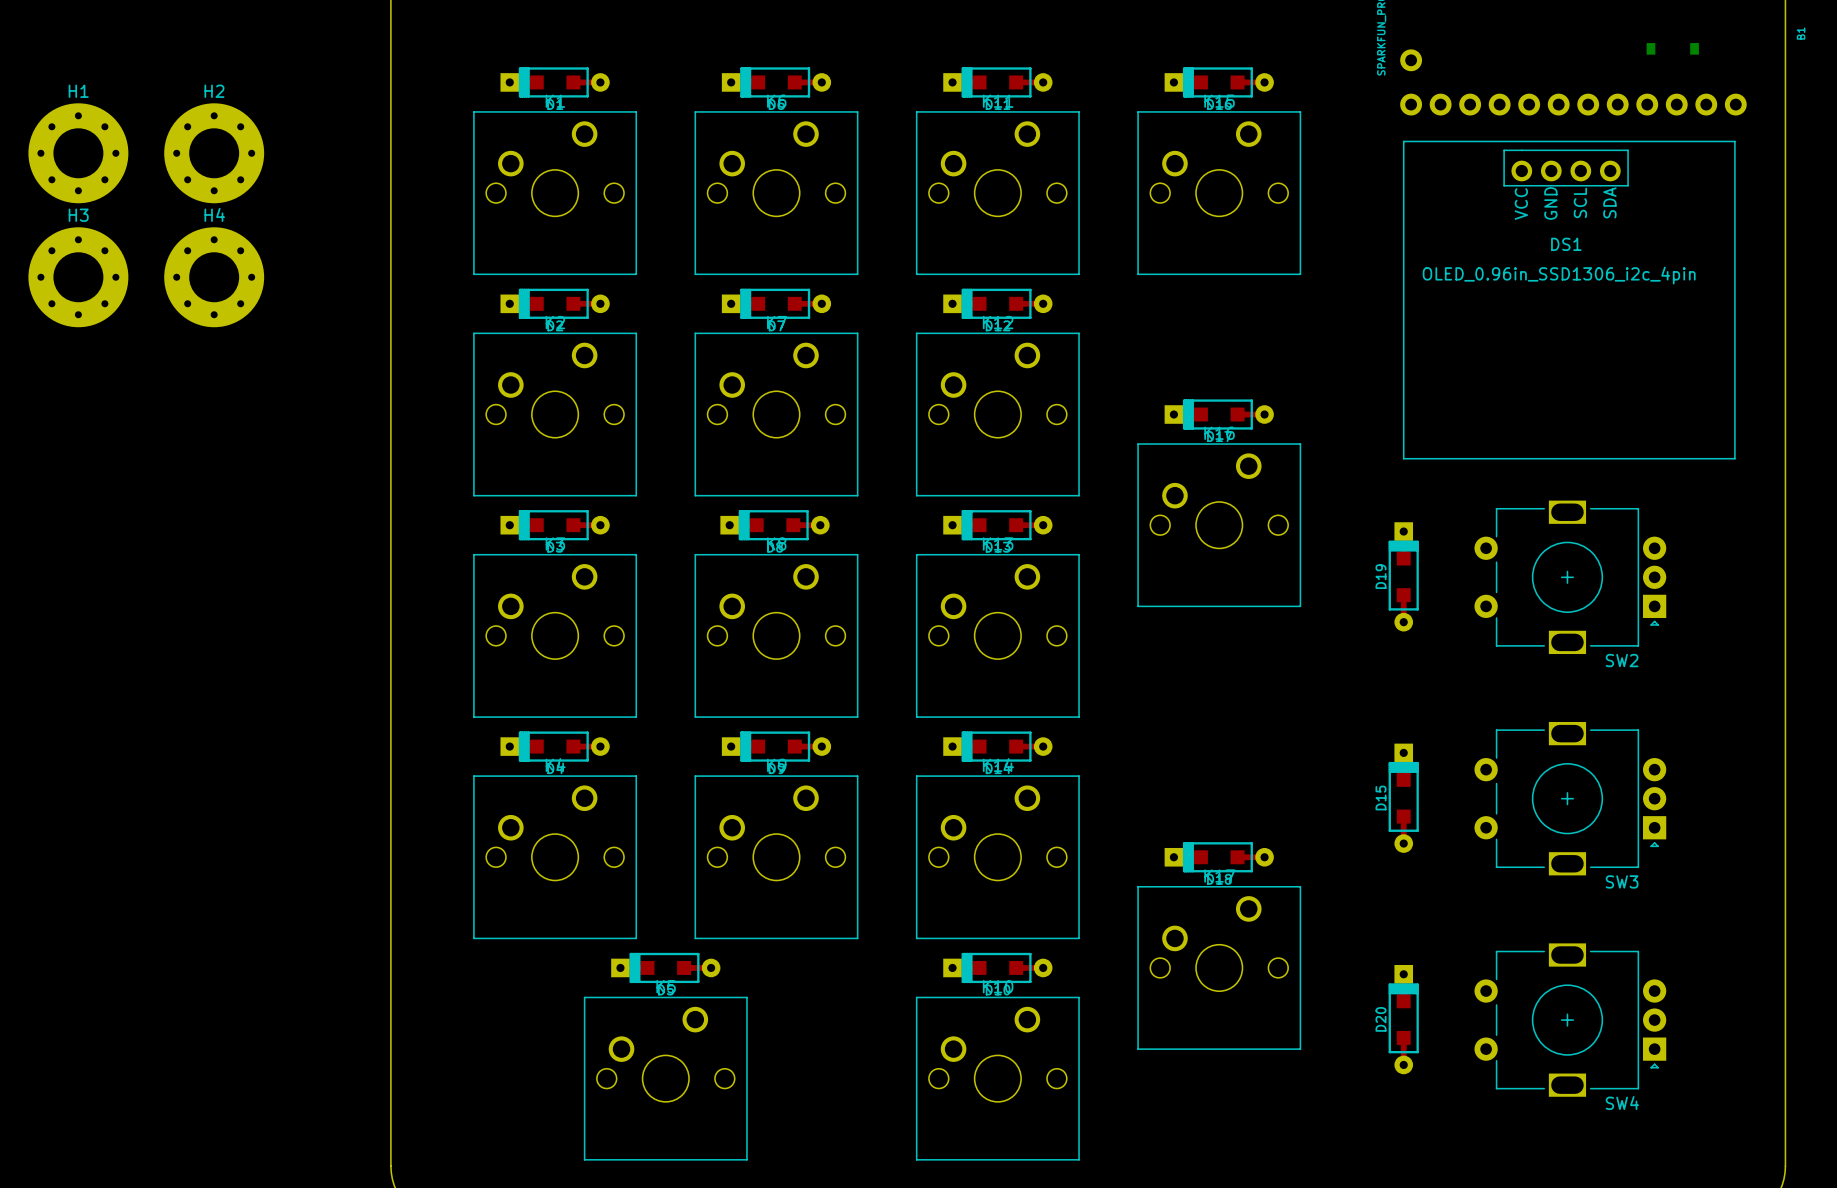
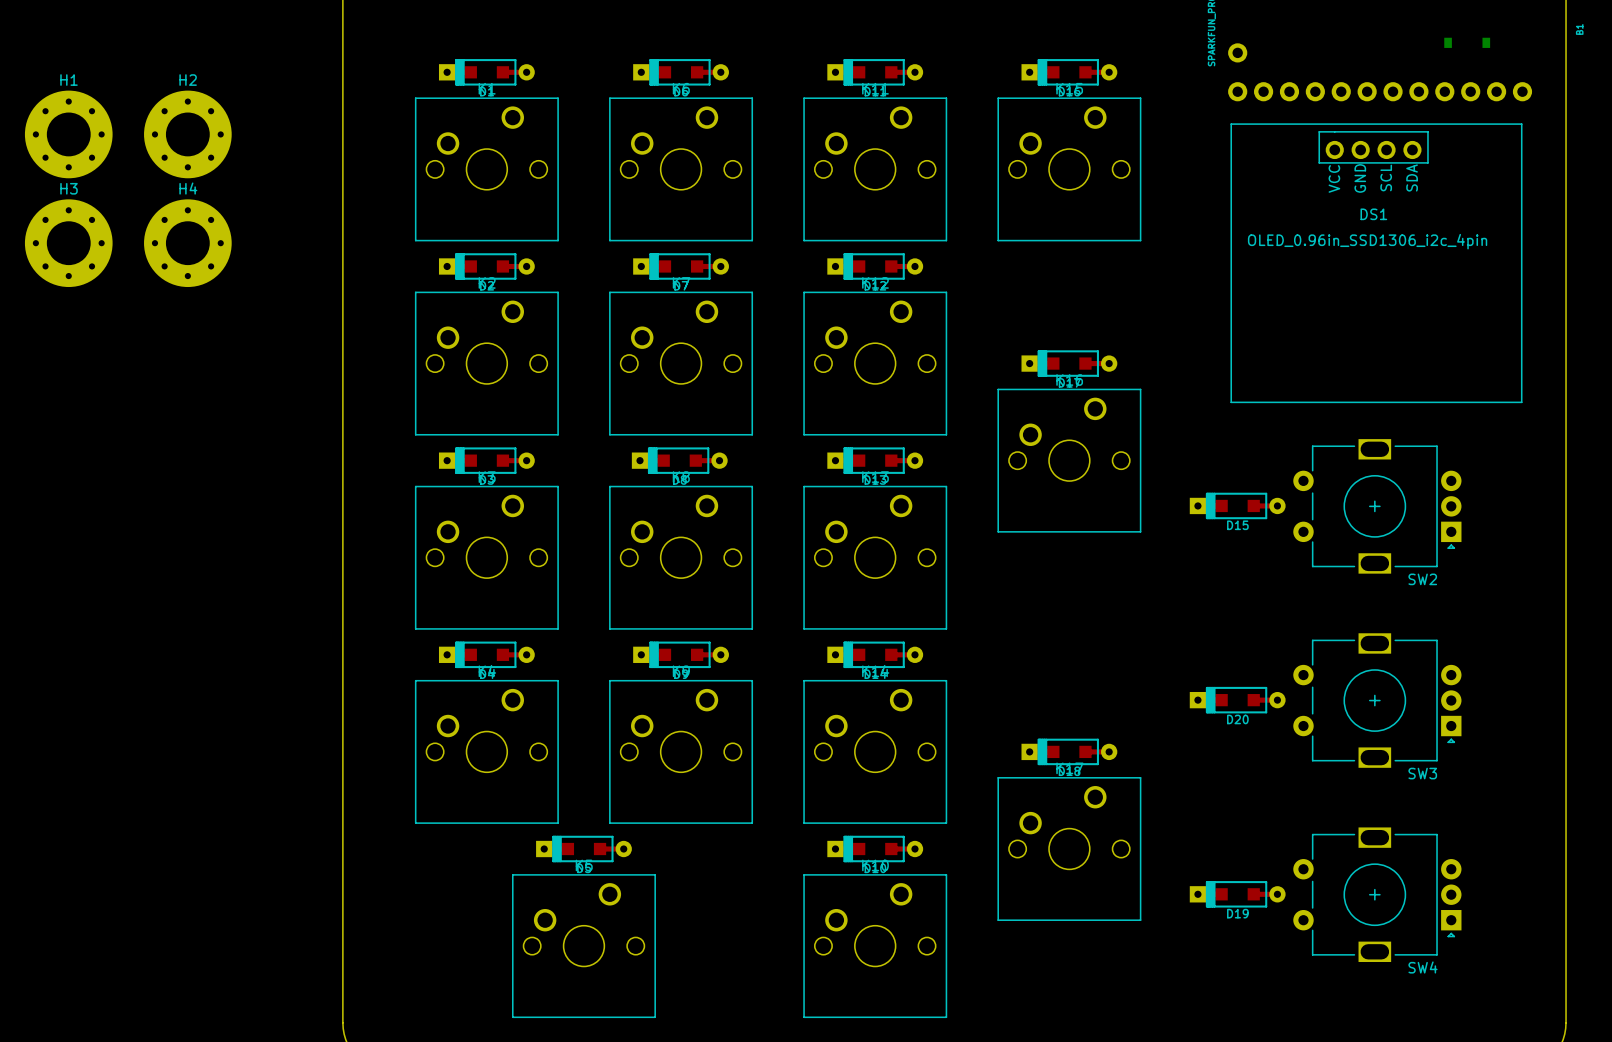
D19 rotation: 0° (1403, 576) -> 90° counterclockwise (1237, 894)
D19 position: (1403, 576) -> (1237, 894)
D15 rotation: 0° (1403, 798) -> 90° counterclockwise (1237, 505)
D15 position: (1403, 798) -> (1237, 505)
D20 rotation: 0° (1403, 1019) -> 90° counterclockwise (1237, 700)
D20 position: (1403, 1019) -> (1237, 700)

